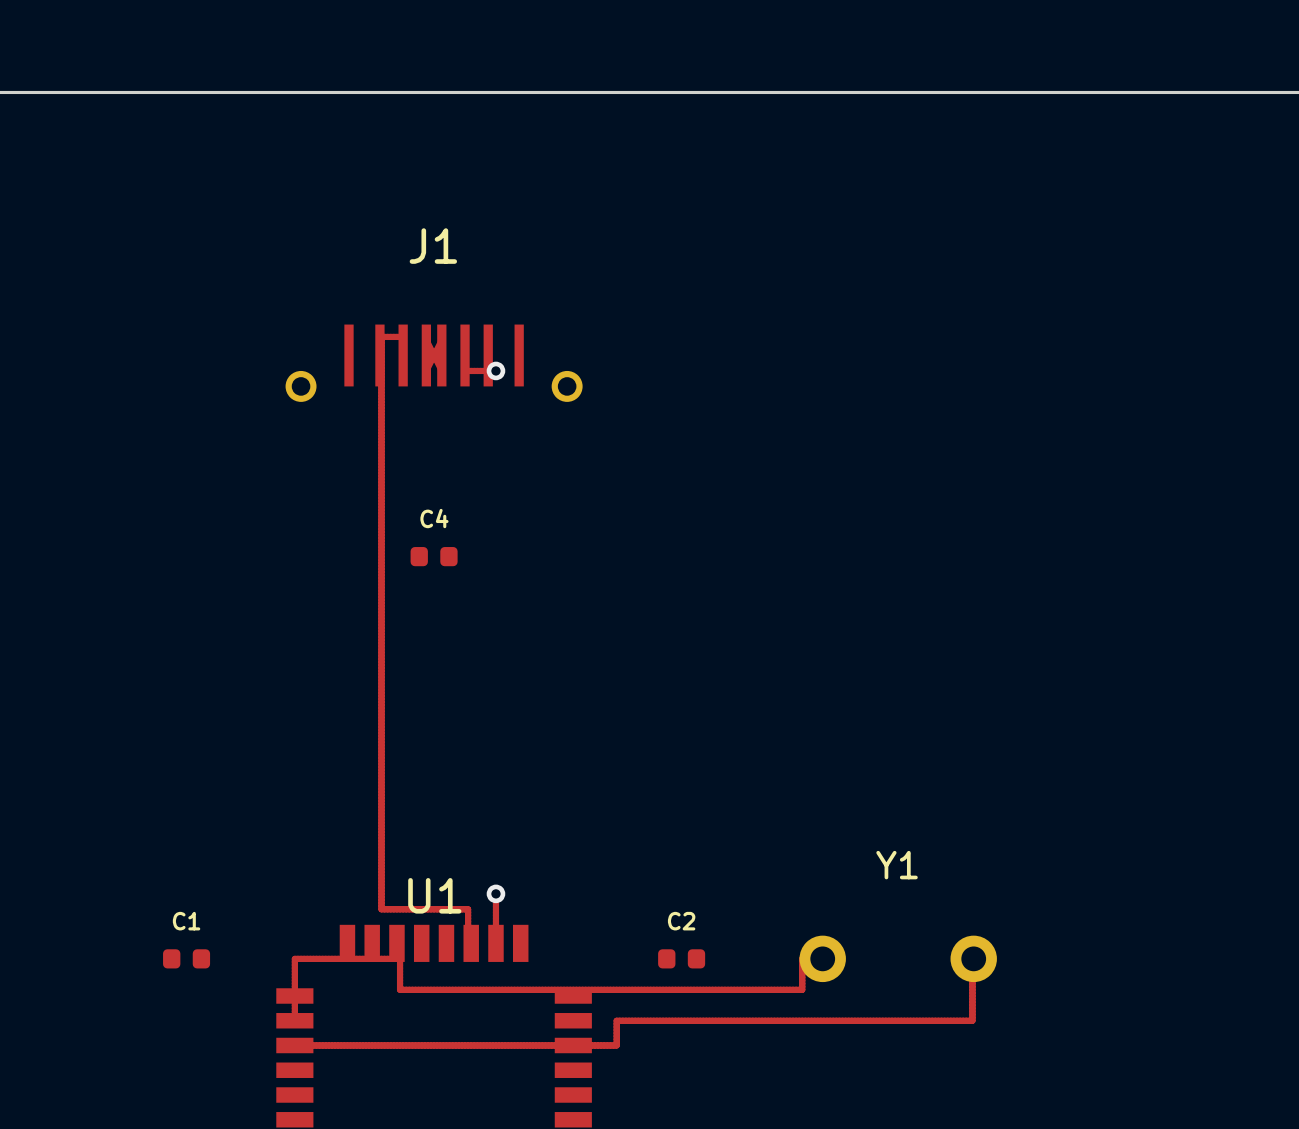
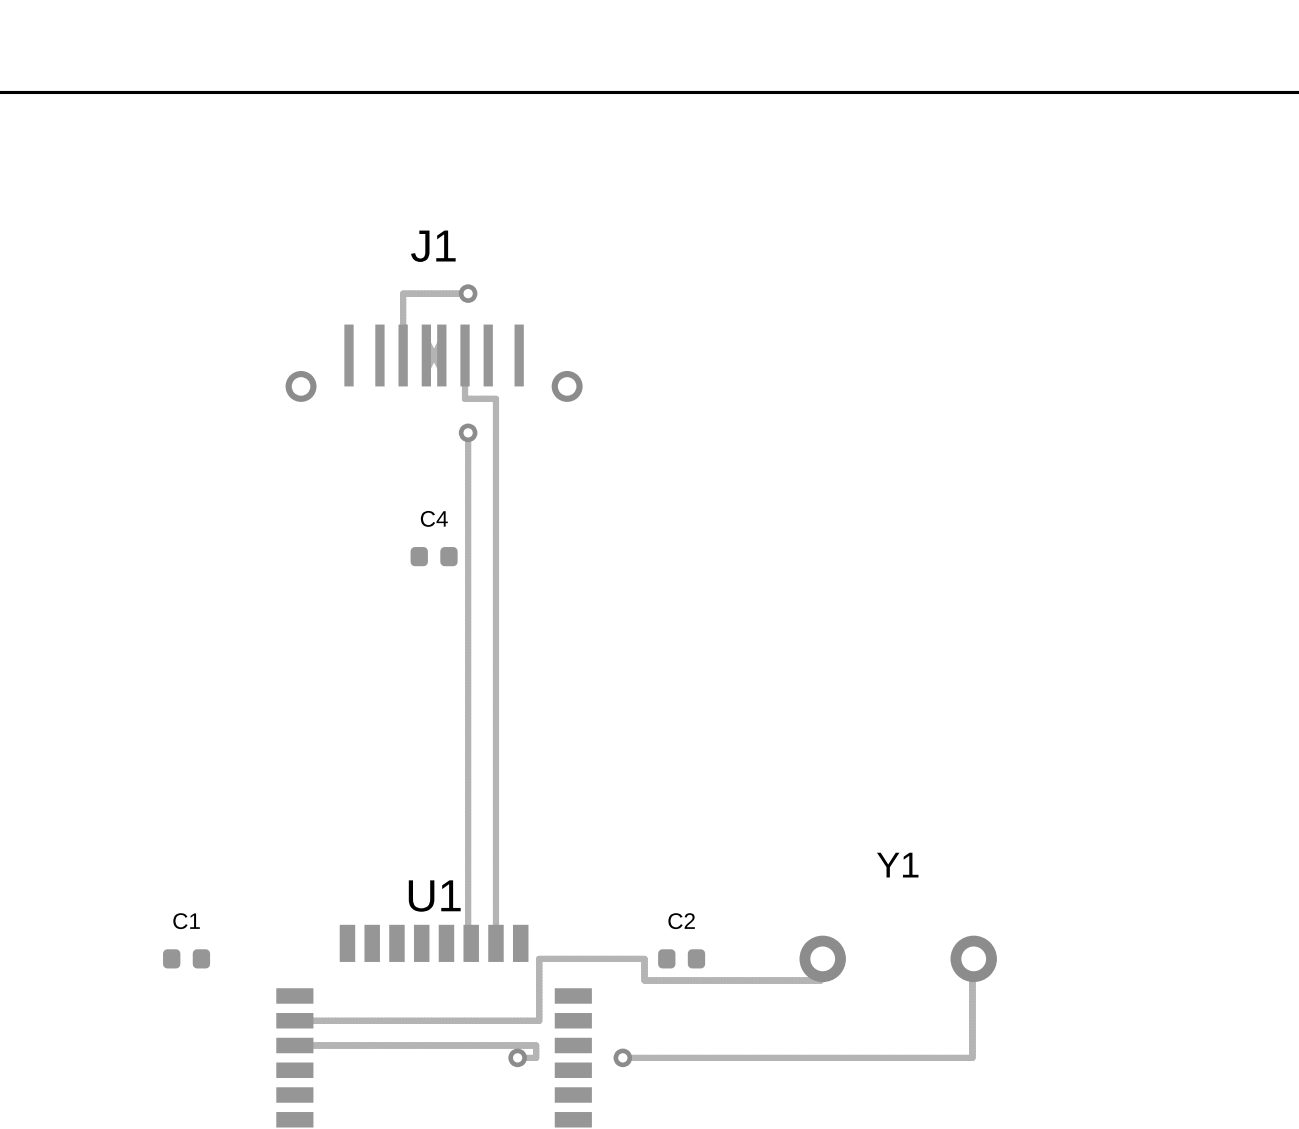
track: none -> (468, 293) (403, 293) (403, 336)
via: none -> (468, 293)
track: (403, 336) (381, 336) (381, 909) (468, 909) -> (468, 432) (468, 909)
track: (465, 370) (495, 370) -> (465, 370) (465, 398) (495, 398) (495, 893)
via: (495, 370) -> none
via: none -> (468, 432)
via: (495, 893) -> none
track: (820, 958) (802, 958) (802, 989) (400, 989) (400, 958) (294, 958) (294, 1020) -> (820, 958) (820, 980) (644, 980) (644, 958) (539, 958) (539, 1020) (294, 1020)
track: (972, 1020) (616, 1020) (616, 1045) (536, 1045) -> (972, 1020) (972, 1057) (622, 1057)
track: none -> (536, 1045) (536, 1057) (517, 1057)
via: none -> (517, 1057)
via: none -> (622, 1057)

